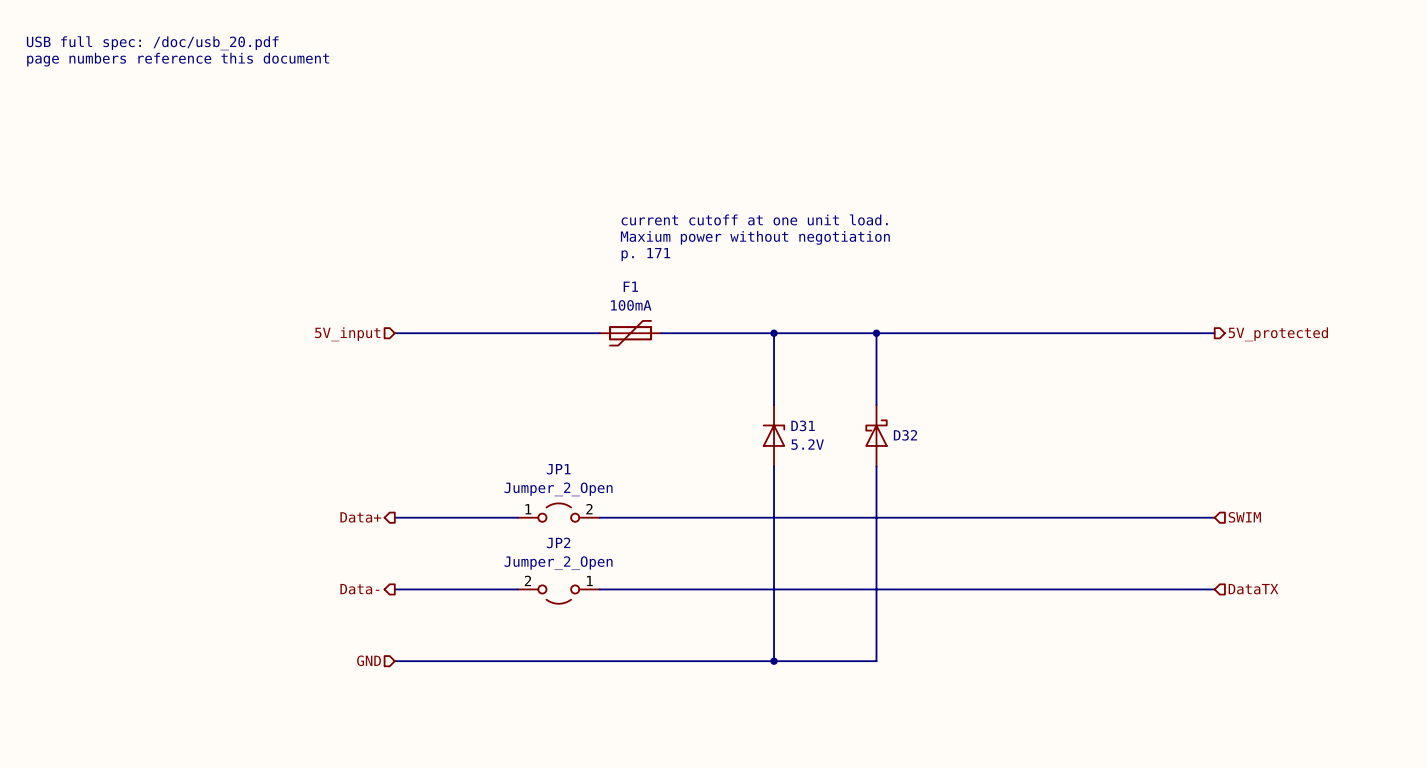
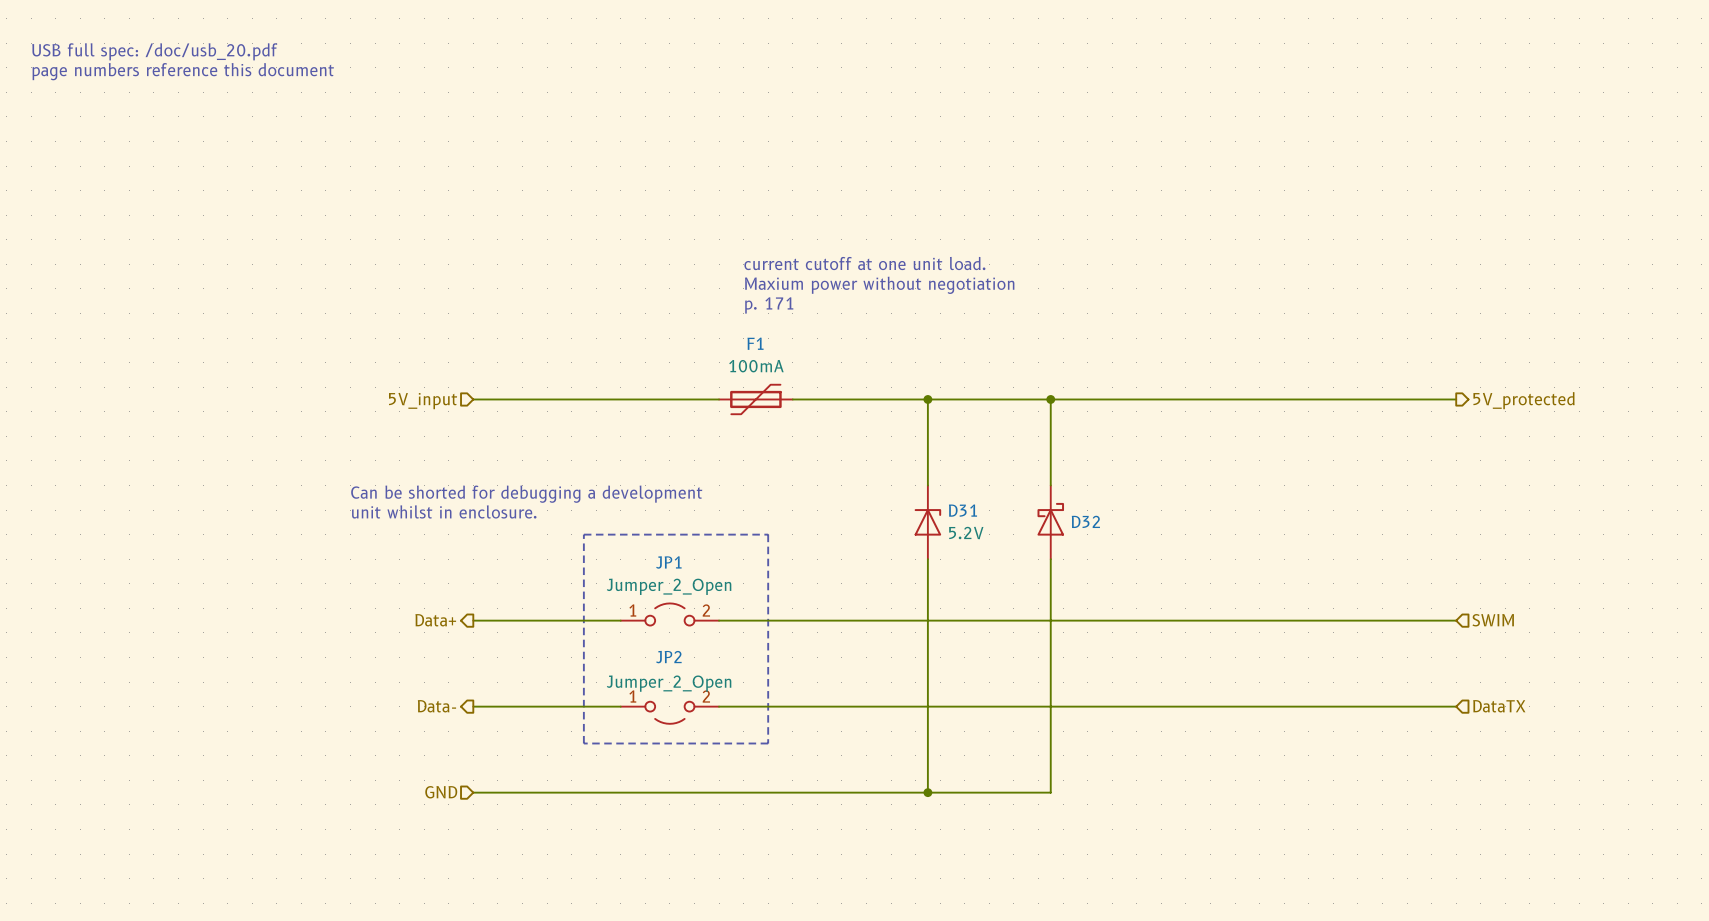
text: none -> Can be shorted for debugging a development (526, 494)
text: none -> unit whilst in enclosure. (444, 511)
line: none -> (583, 534) (768, 534) (768, 743) (583, 743) (583, 534)
JP2 flip: as is (558, 594) -> left-right (669, 712)

